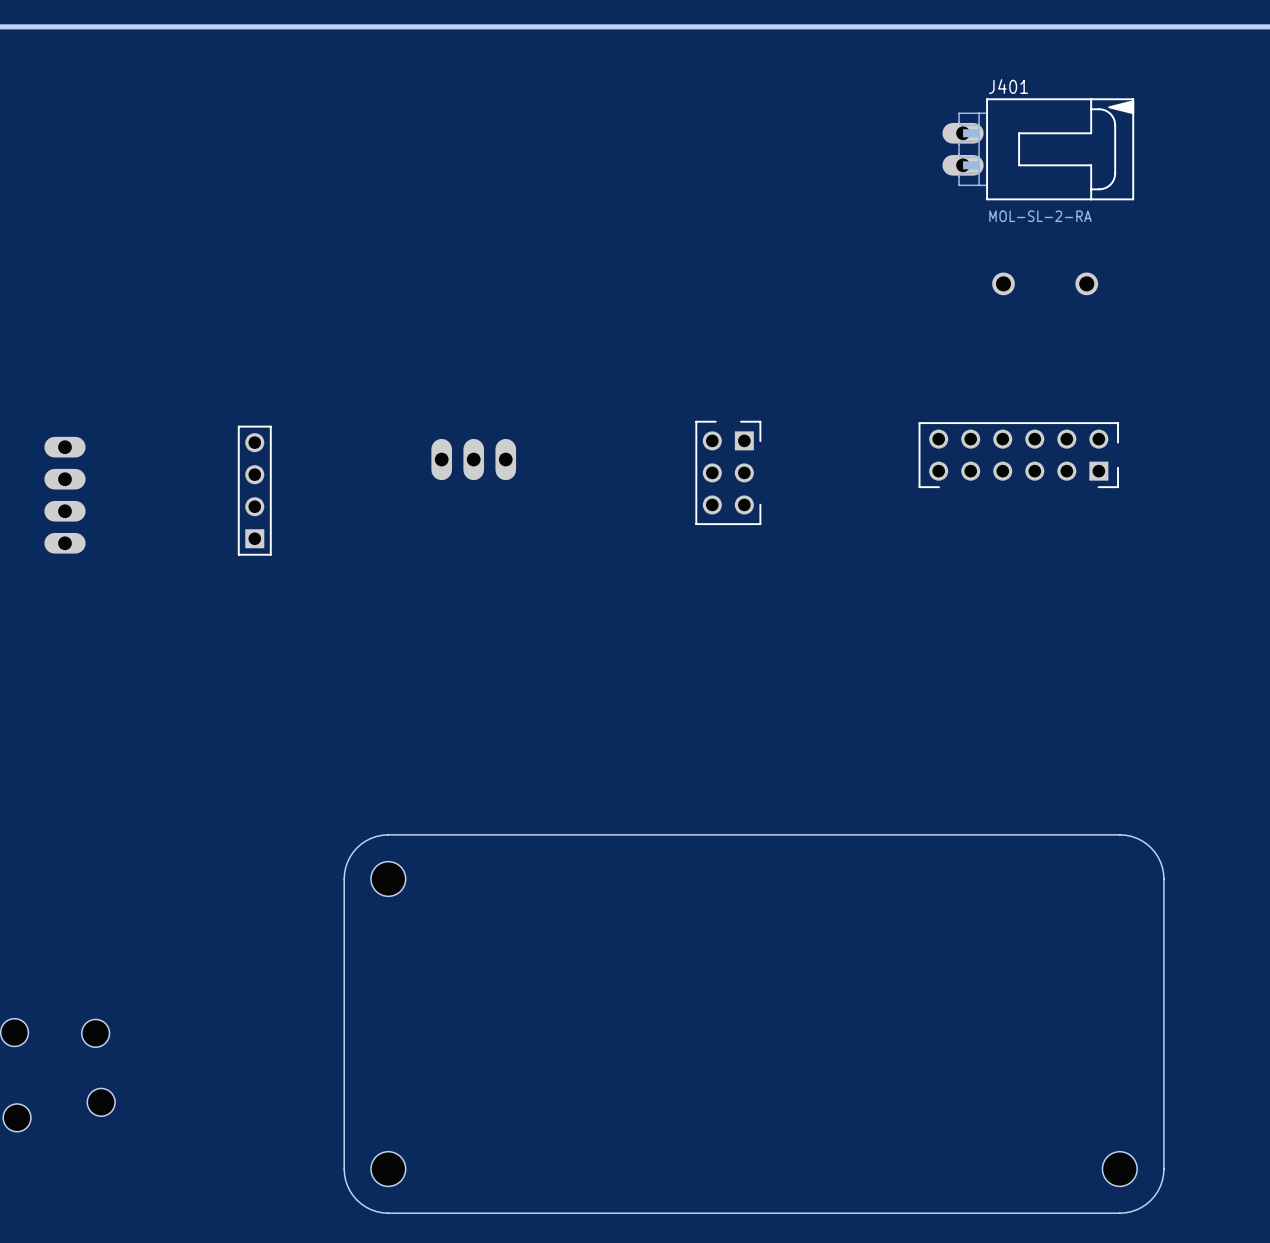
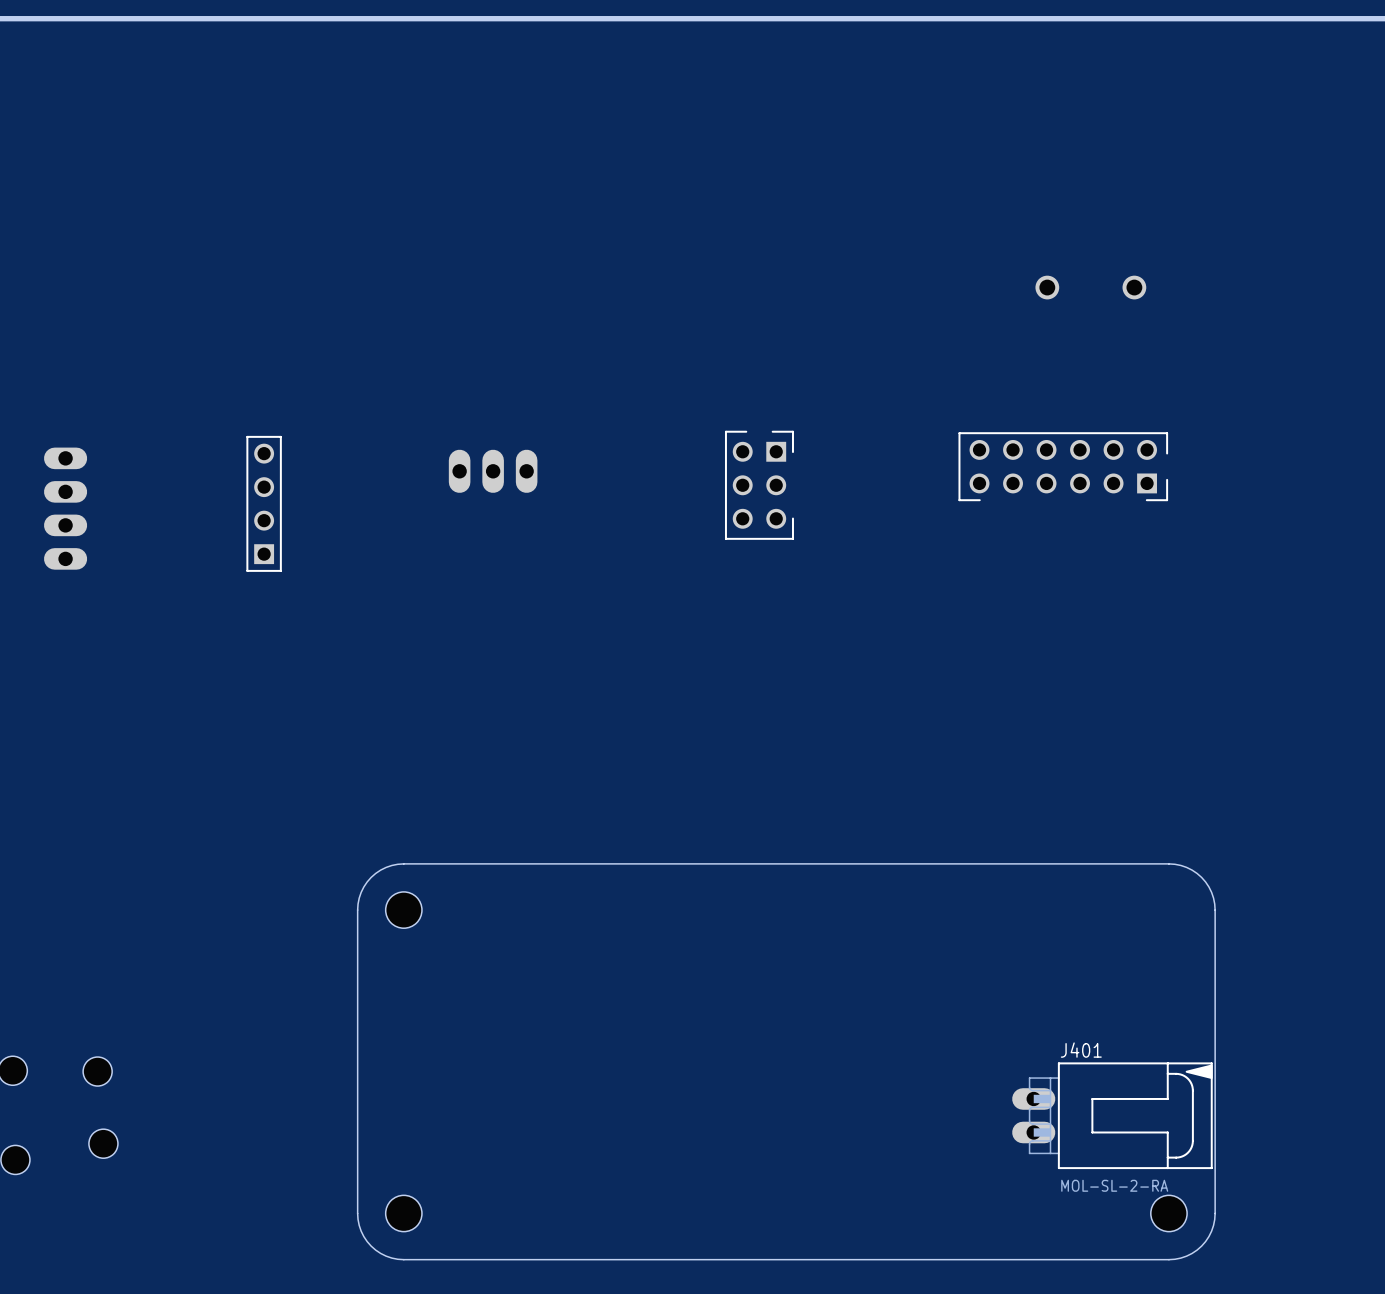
J401 position: (1038, 149) -> (1112, 1115)

